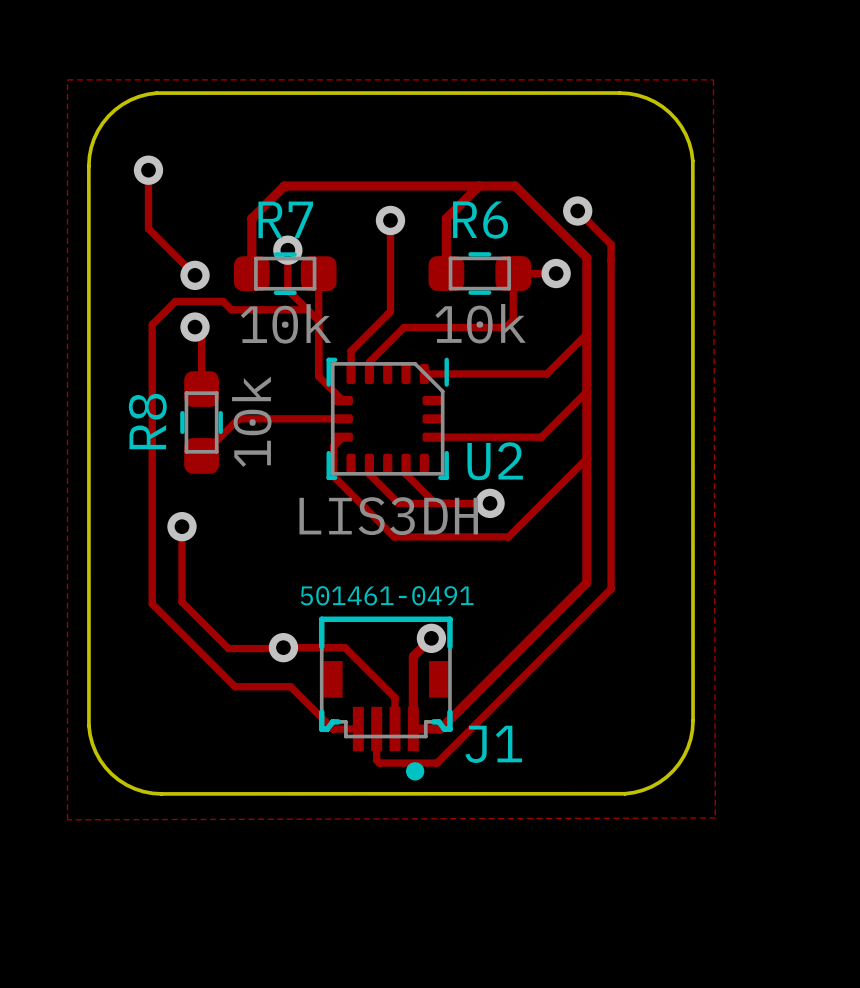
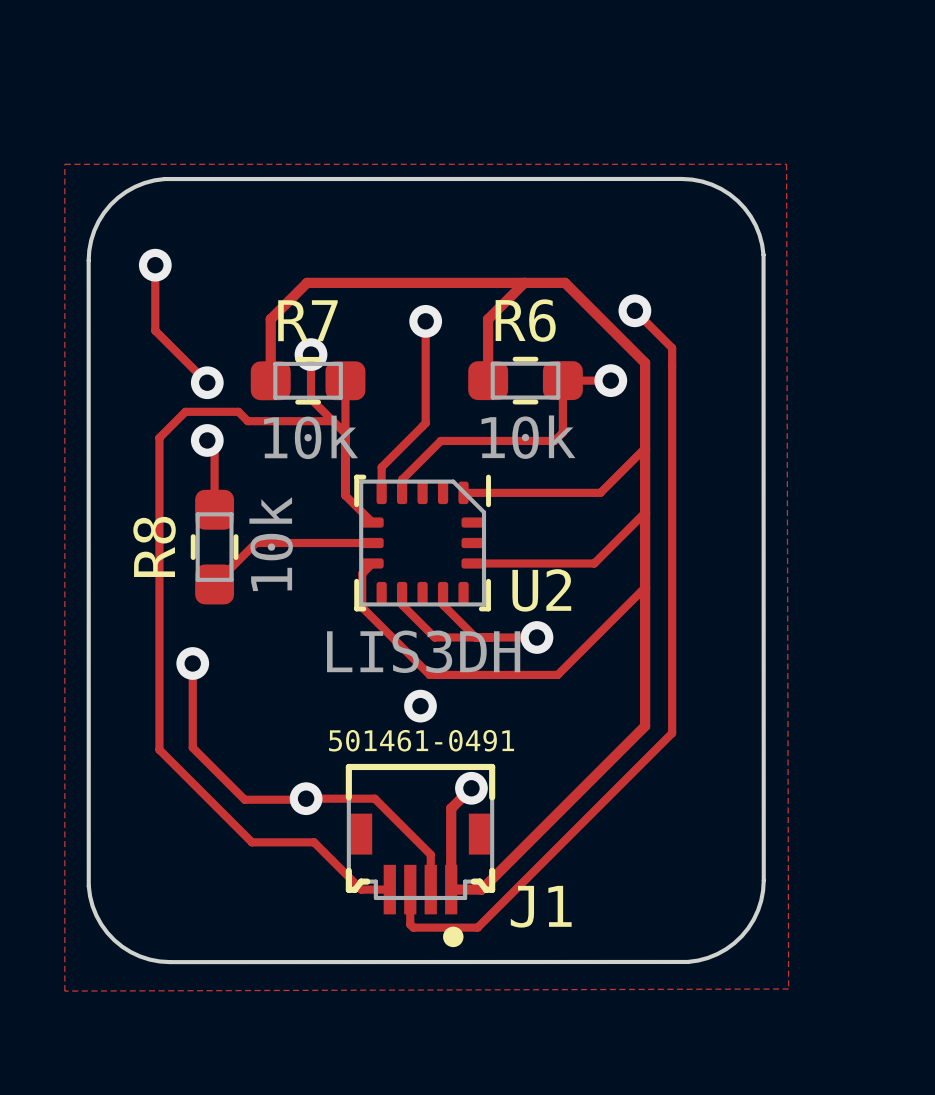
via: none -> (420, 706)

